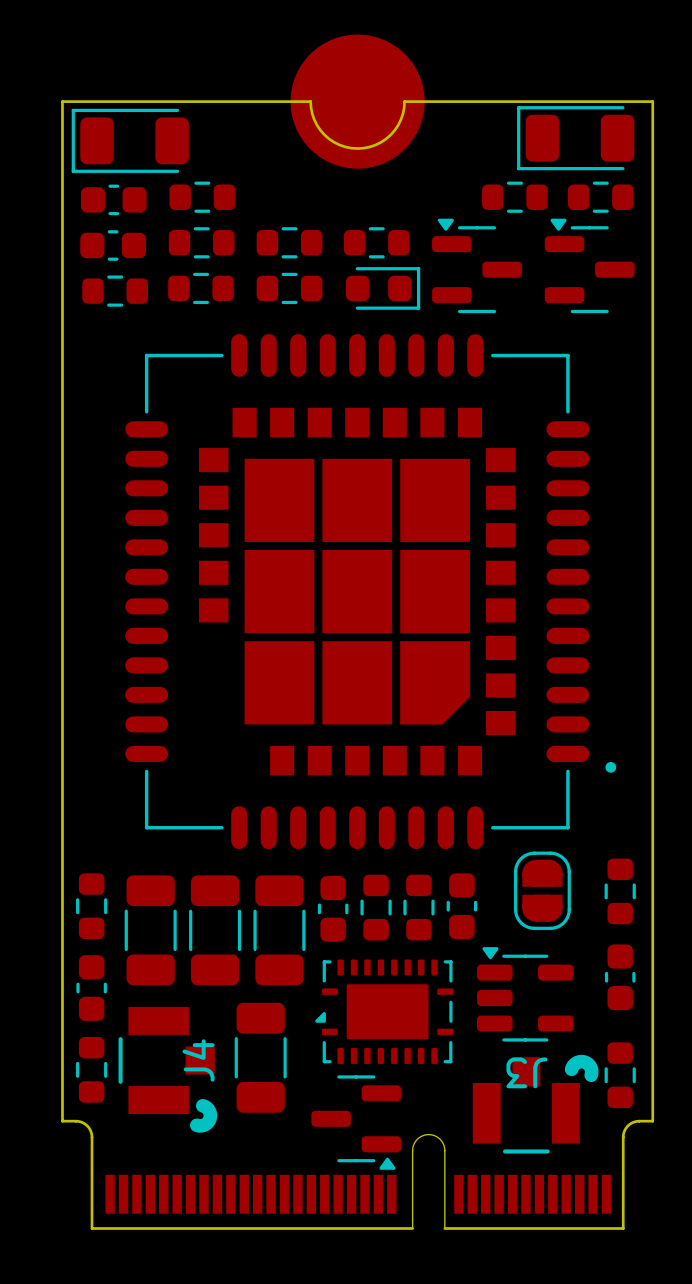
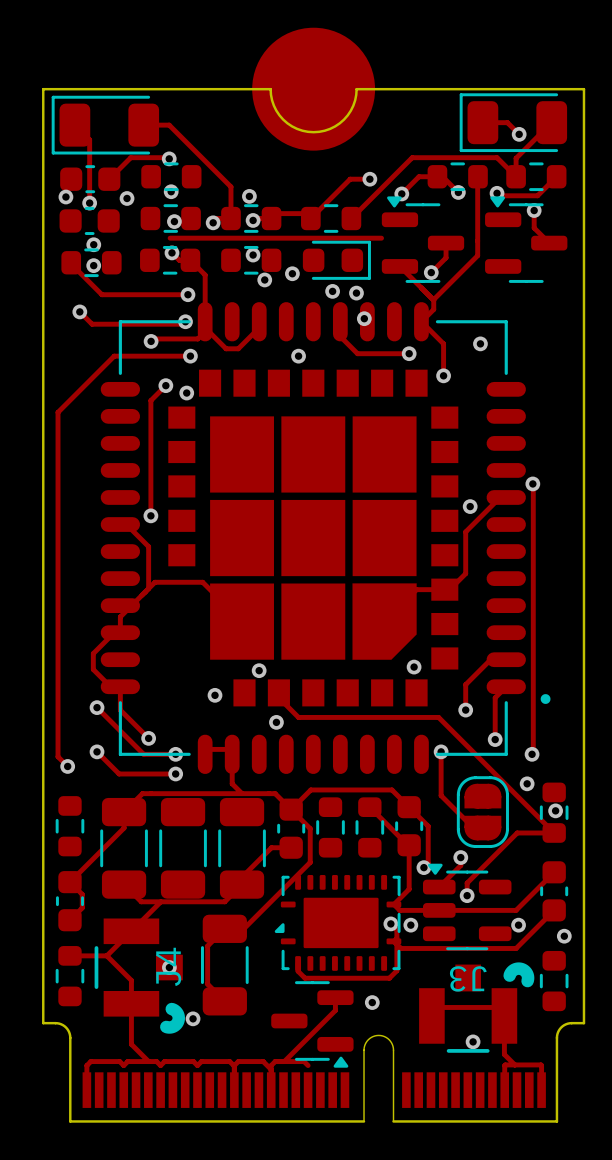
track: none -> (482, 122) (507, 122) (519, 134)
track: none -> (551, 122) (516, 158) (516, 176) (497, 157) (412, 157) (351, 218)
track: none -> (74, 125) (89, 139) (89, 203)
track: none -> (143, 125) (169, 125) (230, 186) (230, 218) (217, 218) (213, 222)
via: none -> (519, 134)
track: none -> (169, 158) (130, 157) (109, 179)
via: none -> (169, 158)
track: none -> (477, 177) (477, 255) (433, 299)
track: none -> (556, 176) (537, 195) (499, 195) (497, 193)
track: none -> (369, 179) (350, 179) (310, 218) (305, 213) (276, 213) (271, 218) (255, 218) (253, 220)
via: none -> (369, 179)
via: none -> (171, 191)
track: none -> (458, 192) (442, 176) (419, 176) (401, 193)
via: none -> (458, 192)
via: none -> (401, 193)
via: none -> (497, 193)
via: none -> (249, 196)
via: none -> (65, 197)
via: none -> (127, 198)
via: none -> (89, 203)
track: none -> (534, 210) (534, 228) (549, 243)
via: none -> (534, 210)
via: none -> (253, 220)
via: none -> (174, 221)
via: none -> (213, 222)
track: none -> (170, 238) (381, 238)
track: none -> (446, 243) (446, 257) (431, 272)
via: none -> (93, 244)
track: none -> (171, 252) (179, 260) (190, 260) (205, 275) (205, 331) (197, 338) (153, 338) (151, 341)
via: none -> (171, 252)
via: none -> (253, 255)
track: none -> (71, 262) (101, 294) (187, 294)
via: none -> (93, 265)
track: none -> (399, 266) (433, 300) (433, 309) (421, 321) (443, 343) (443, 375)
via: none -> (431, 272)
via: none -> (292, 273)
via: none -> (264, 279)
via: none -> (332, 291)
via: none -> (356, 293)
via: none -> (187, 294)
track: none -> (79, 311) (92, 324) (183, 324) (185, 321)
via: none -> (79, 311)
via: none -> (364, 318)
via: none -> (185, 321)
track: none -> (259, 321) (259, 327) (238, 348) (226, 348) (205, 327)
track: none -> (340, 321) (340, 336) (357, 353) (409, 353)
via: none -> (151, 341)
via: none -> (480, 343)
via: none -> (409, 353)
track: none -> (190, 356) (114, 356) (58, 412) (58, 756) (67, 766)
via: none -> (190, 356)
via: none -> (298, 356)
via: none -> (443, 375)
track: none -> (165, 385) (150, 400) (150, 515)
via: none -> (165, 385)
via: none -> (186, 393)
track: none -> (532, 483) (532, 754)
via: none -> (532, 483)
track: none -> (506, 497) (500, 497) (465, 531) (465, 573) (449, 589) (416, 589) (384, 621)
via: none -> (470, 506)
via: none -> (150, 515)
track: none -> (120, 524) (126, 524) (148, 546) (148, 588)
track: none -> (242, 621) (202, 582) (154, 582) (120, 616) (120, 632) (114, 632) (93, 653) (93, 669) (110, 686) (120, 686) (120, 710) (148, 738)
track: none -> (506, 659) (490, 659) (465, 684) (465, 710)
via: none -> (414, 667)
via: none -> (259, 670)
track: none -> (506, 686) (495, 697) (495, 739)
track: none -> (278, 692) (278, 697) (298, 717) (438, 717) (554, 832) (517, 832) (467, 883) (467, 895)
via: none -> (215, 695)
track: none -> (97, 707) (143, 754) (175, 754)
via: none -> (97, 707)
via: none -> (465, 710)
via: none -> (276, 722)
via: none -> (148, 738)
via: none -> (495, 739)
track: none -> (97, 751) (119, 773) (175, 773)
via: none -> (97, 751)
track: none -> (441, 751) (441, 795) (473, 828) (482, 828)
via: none -> (441, 751)
via: none -> (175, 754)
track: none -> (205, 754) (210, 749) (227, 749) (232, 754) (232, 783) (242, 793)
via: none -> (532, 754)
via: none -> (67, 766)
via: none -> (175, 773)
via: none -> (527, 783)
track: none -> (369, 807) (409, 845) (409, 889) (393, 904) (399, 910) (516, 910) (554, 872)
track: none -> (291, 809) (310, 789) (391, 789) (428, 826) (428, 863) (423, 867)
via: none -> (555, 810)
track: none -> (291, 847) (271, 847) (242, 877) (242, 884) (224, 901) (141, 901) (124, 884)
track: none -> (460, 857) (460, 865) (439, 887)
via: none -> (460, 857)
via: none -> (423, 867)
via: none -> (467, 895)
track: none -> (160, 901) (106, 955)
track: none -> (554, 910) (516, 948) (401, 948) (393, 941) (396, 938) (396, 929) (390, 923)
track: none -> (69, 920) (82, 907) (82, 894) (69, 882) (124, 828) (124, 812) (142, 793) (275, 793) (310, 828) (310, 862) (243, 928) (224, 928) (207, 946) (207, 984) (224, 1001)
via: none -> (390, 923)
via: none -> (410, 925)
via: none -> (518, 925)
via: none -> (564, 936)
track: none -> (396, 944) (396, 970) (389, 978) (305, 978) (298, 971) (298, 963)
track: none -> (69, 955) (106, 955)
track: none -> (106, 955) (131, 980) (131, 1044) (148, 1061)
via: none -> (169, 967)
track: none -> (335, 997) (335, 1010) (284, 1061)
via: none -> (372, 1002)
track: none -> (431, 1015) (440, 1007) (495, 1007) (504, 1015) (504, 1054) (514, 1064)
via: none -> (193, 1018)
via: none -> (473, 1041)
track: none -> (308, 1065) (304, 1061) (275, 1061) (271, 1065) (271, 1090)
track: none -> (234, 1066) (229, 1061) (201, 1061) (197, 1065) (193, 1061) (164, 1061) (160, 1065) (156, 1061) (127, 1061) (123, 1065) (119, 1061) (90, 1061) (86, 1065) (86, 1090)
track: none -> (271, 1069) (263, 1061) (238, 1061) (234, 1065) (234, 1090)
track: none -> (504, 1090) (505, 1064) (540, 1064) (541, 1090)

